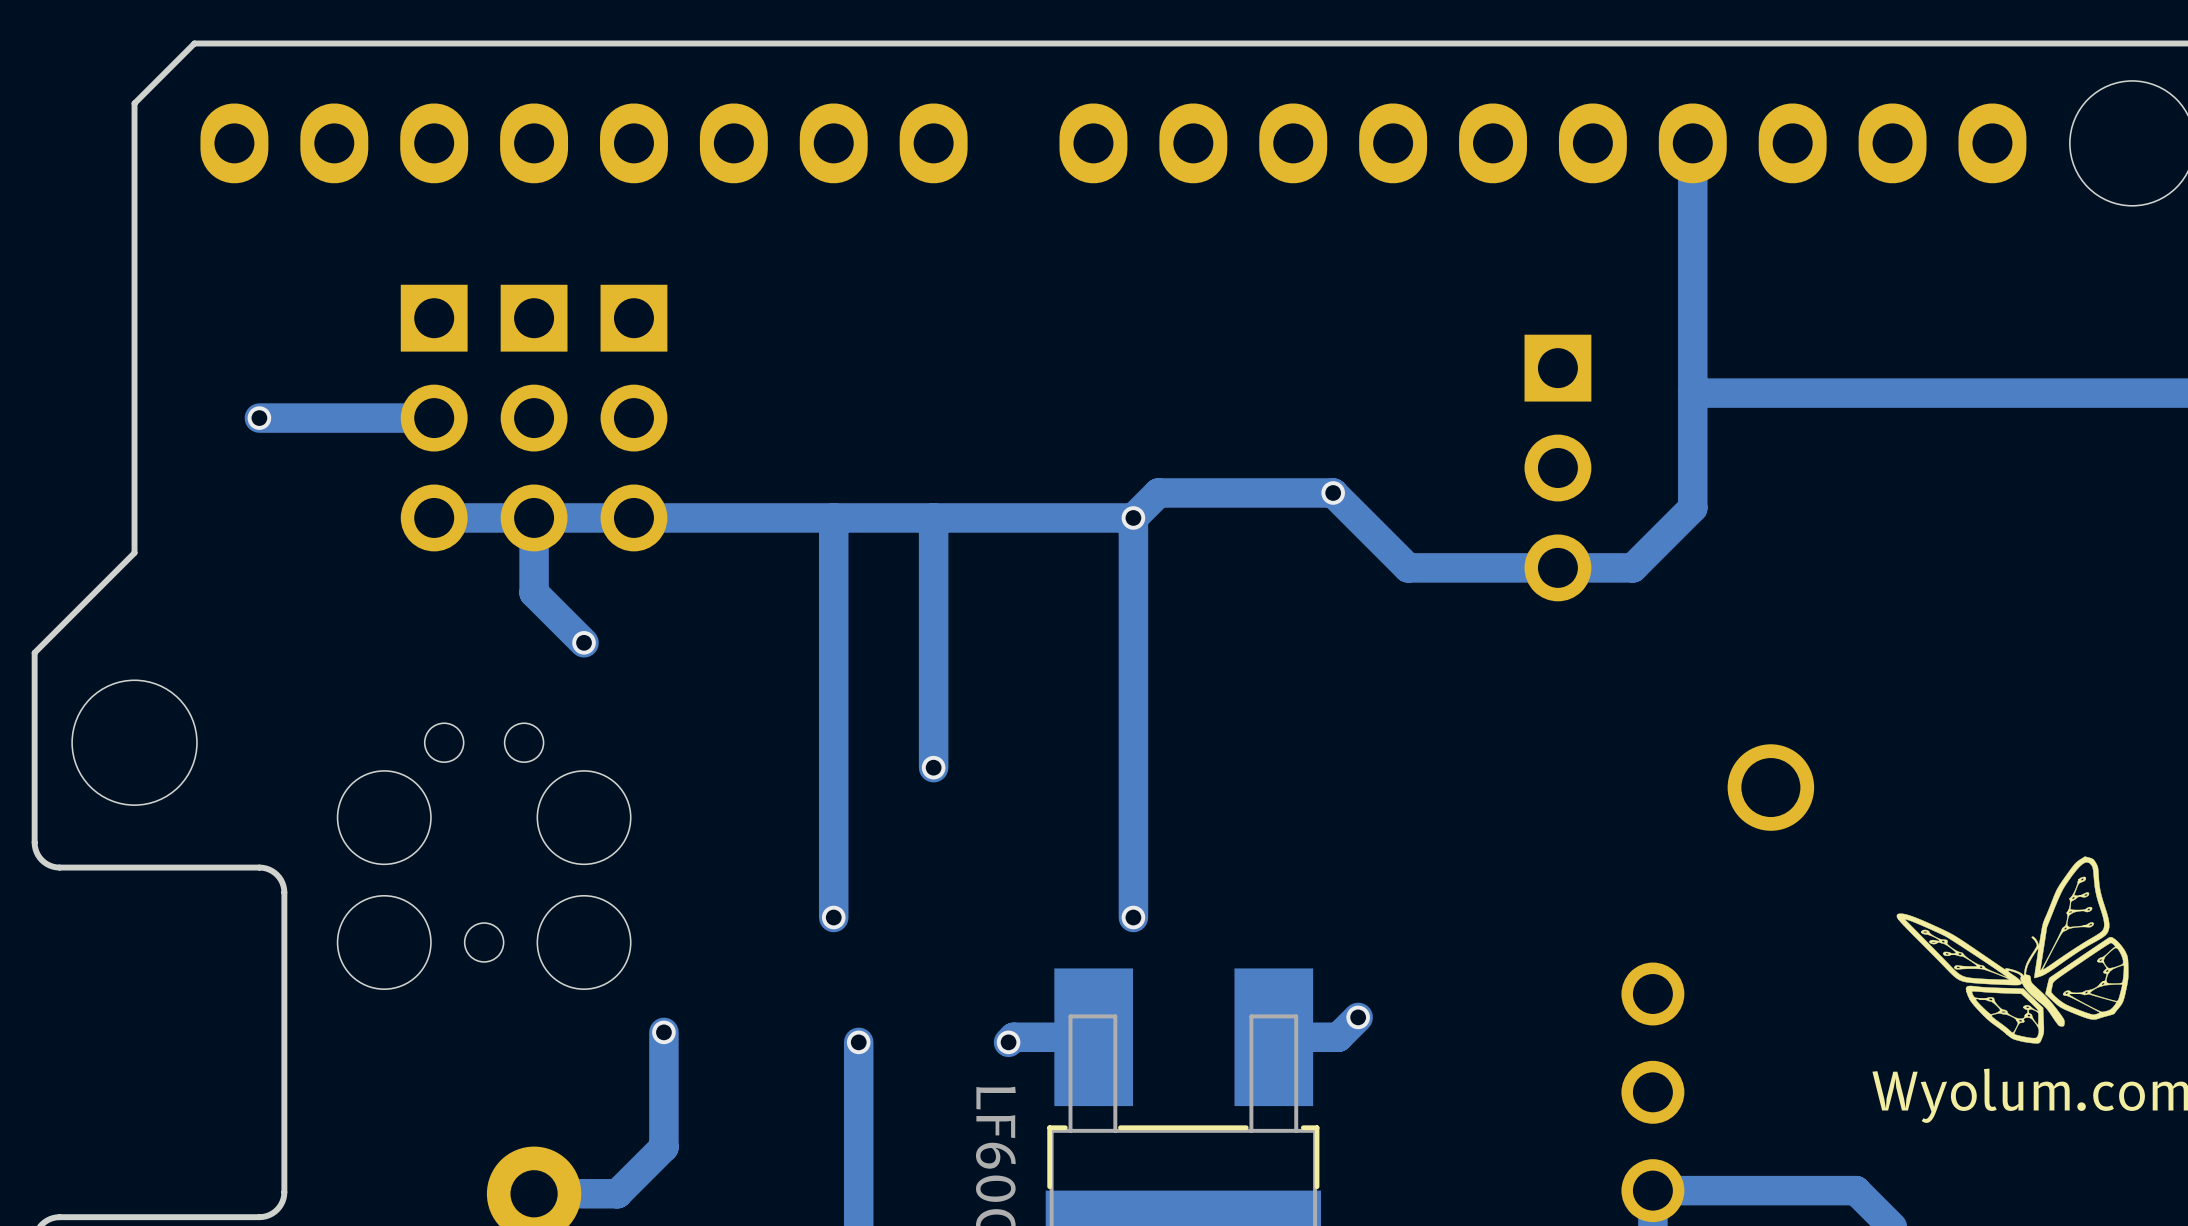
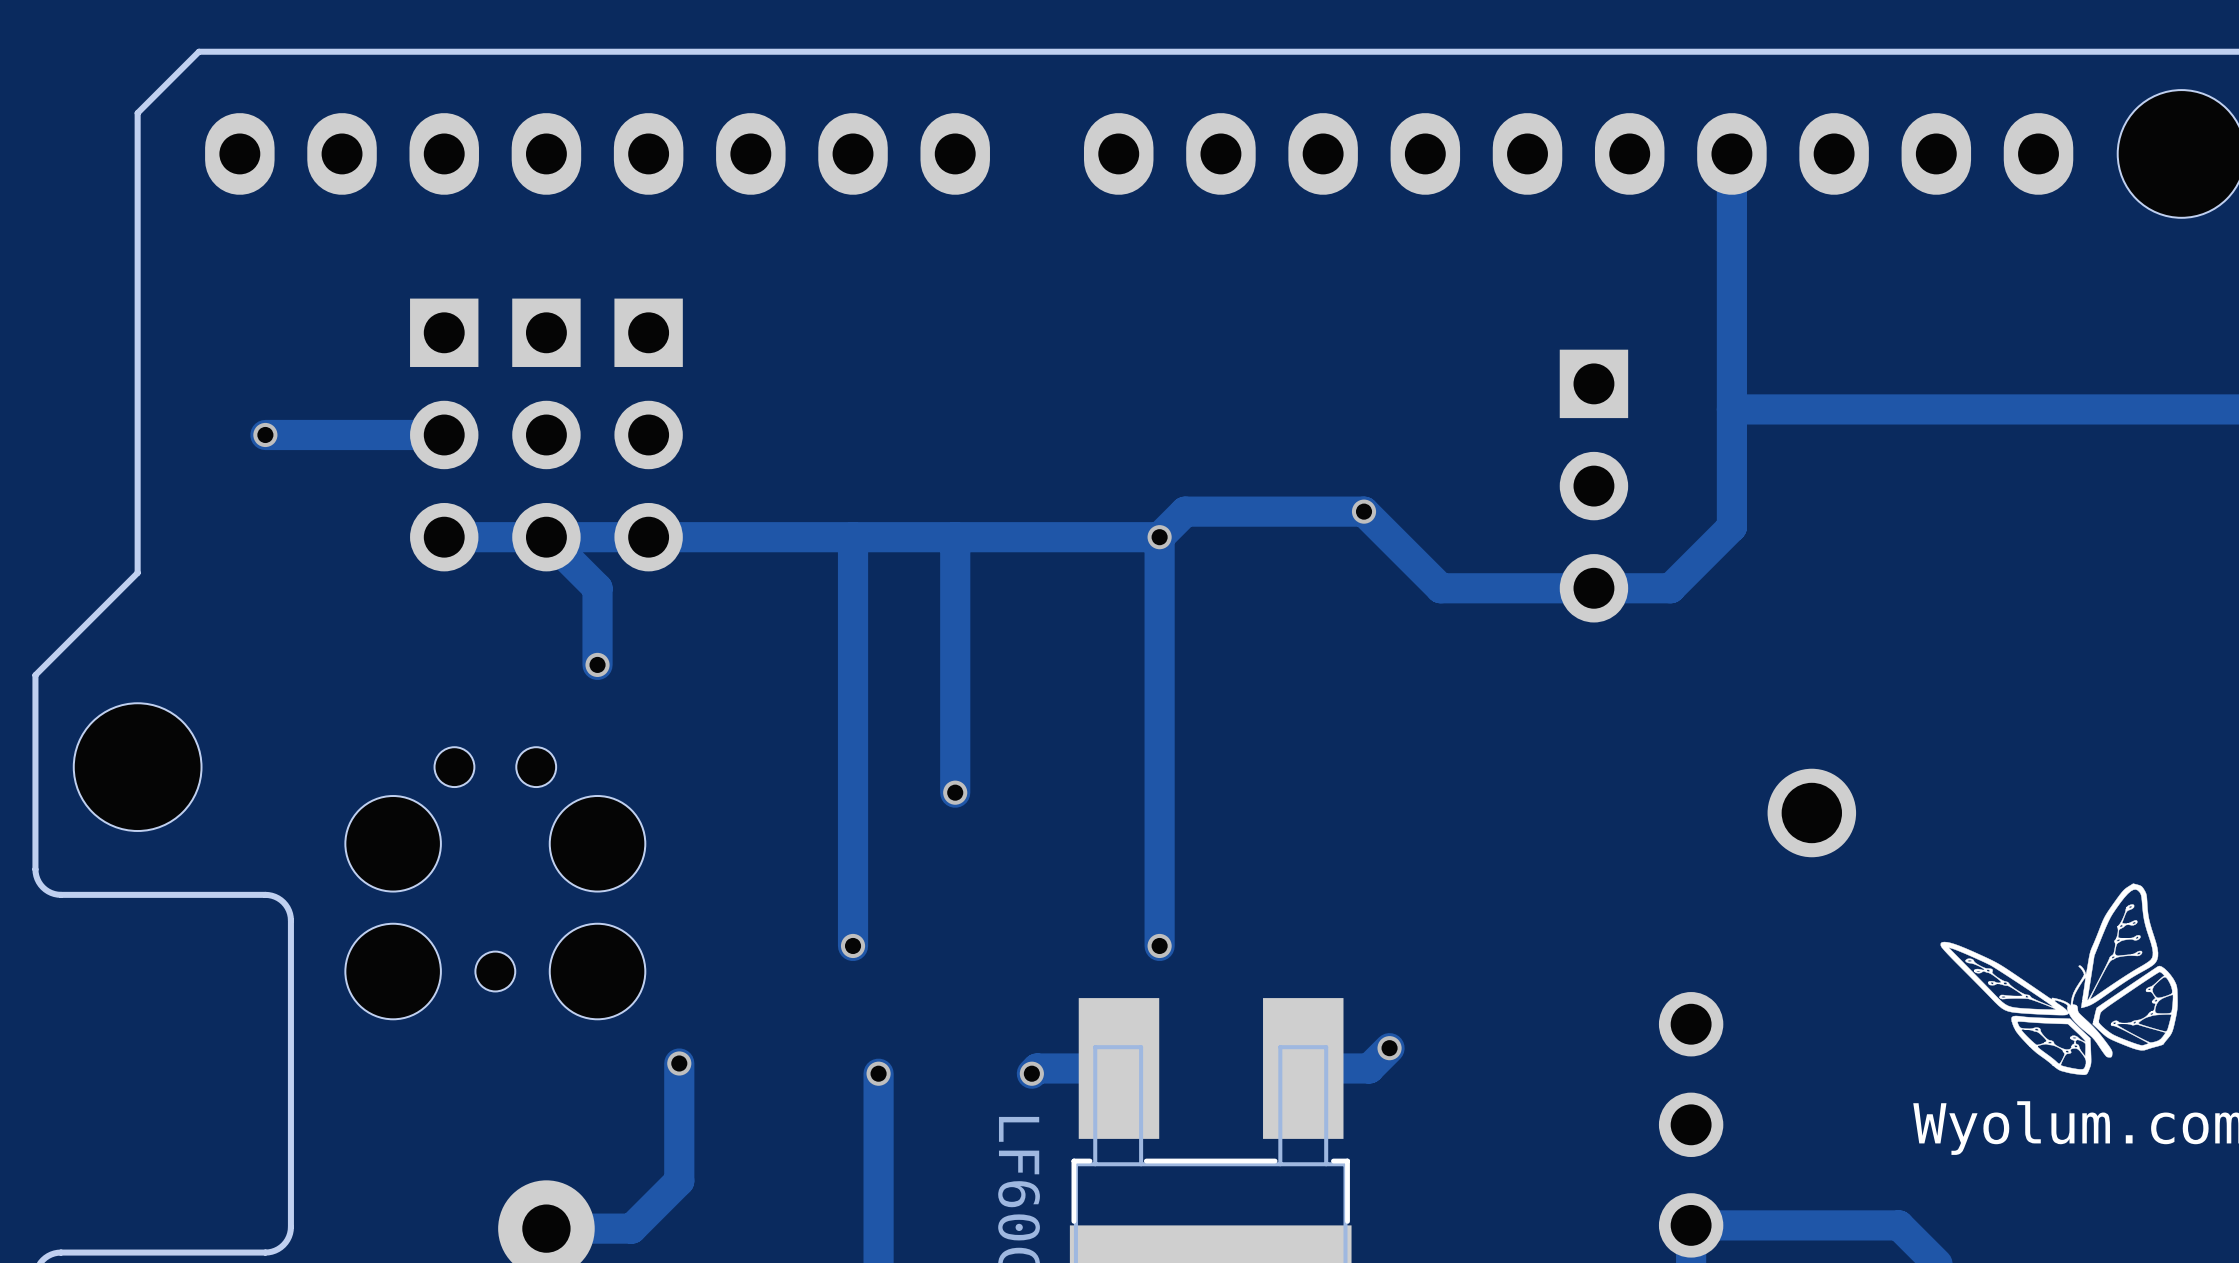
track: (534, 517) (534, 592) (584, 642) -> (546, 537) (597, 588) (597, 664)

